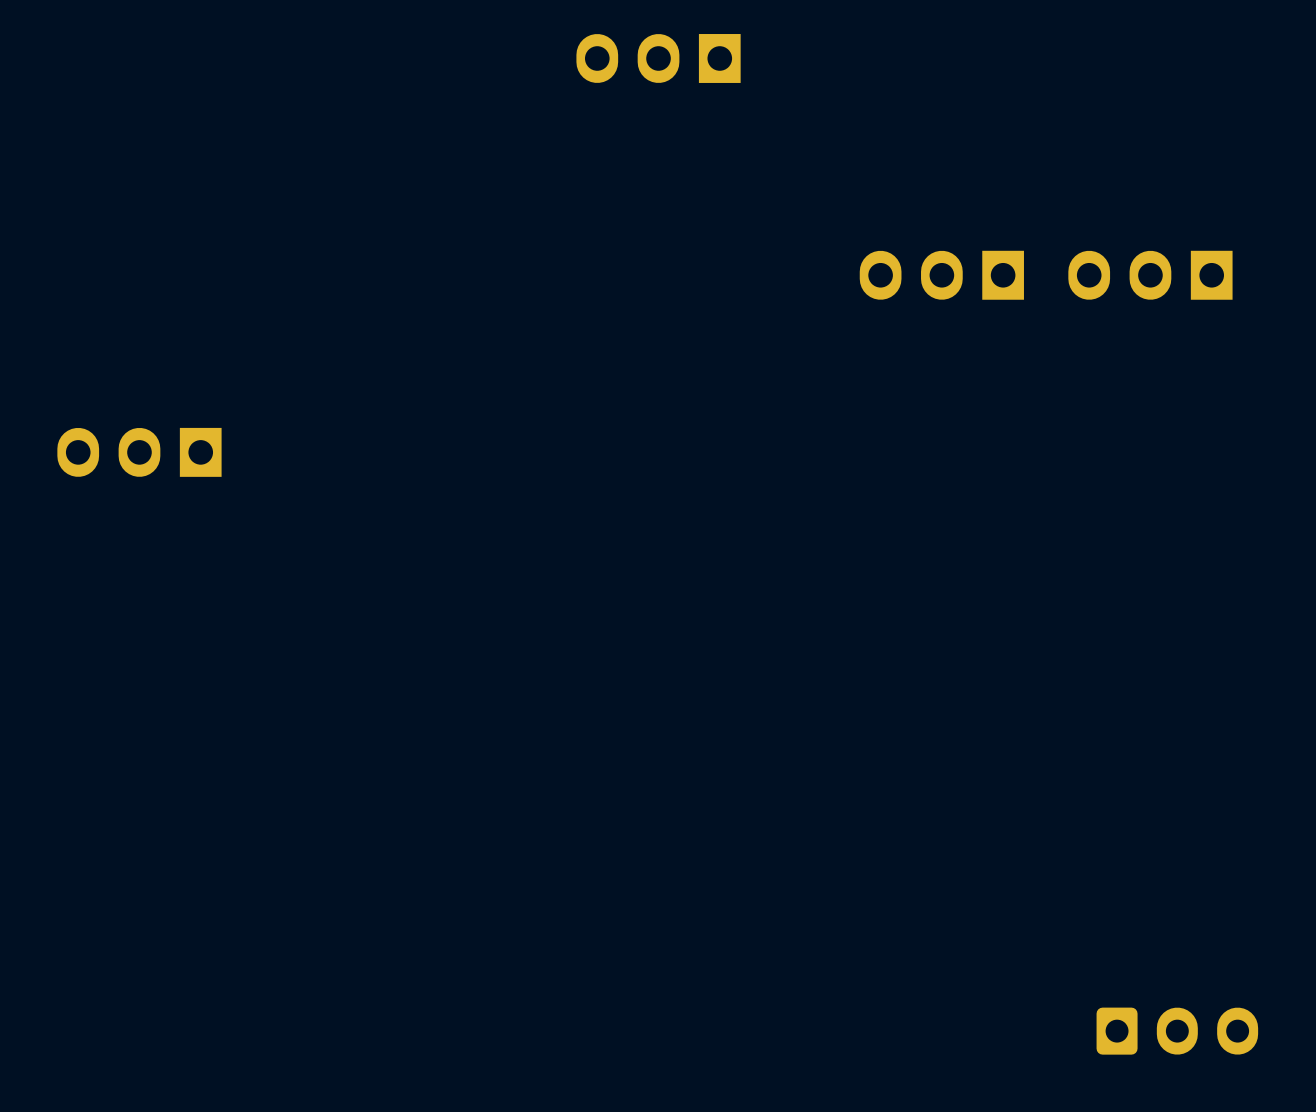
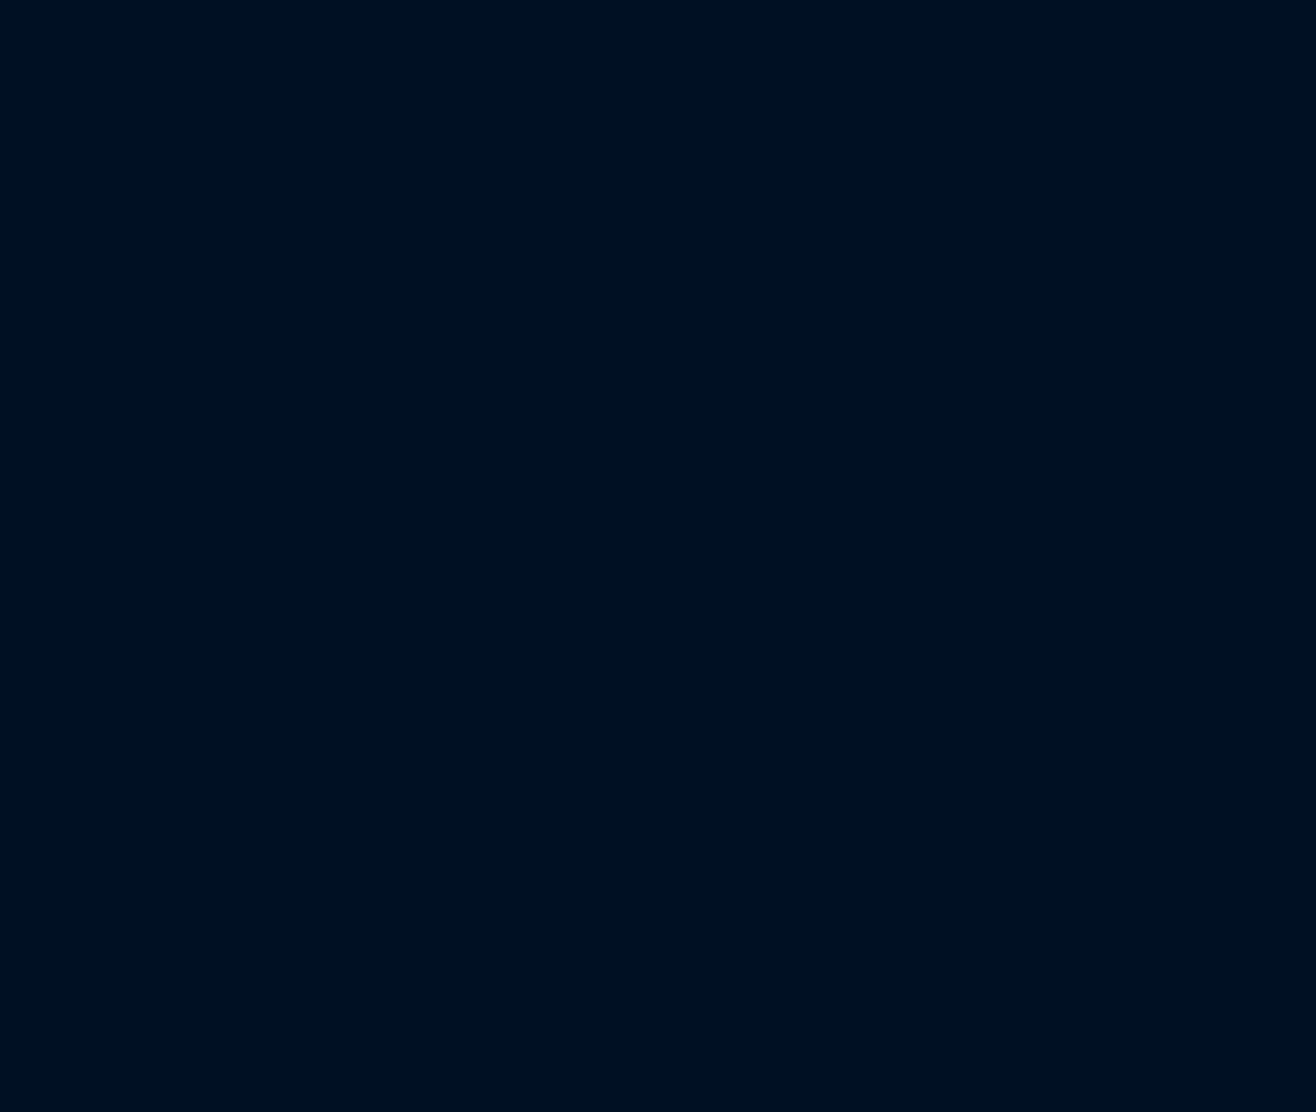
part: (658, 58) -> none
part: (941, 275) -> none
part: (1150, 275) -> none
part: (139, 452) -> none
part: (1177, 1031) -> none

